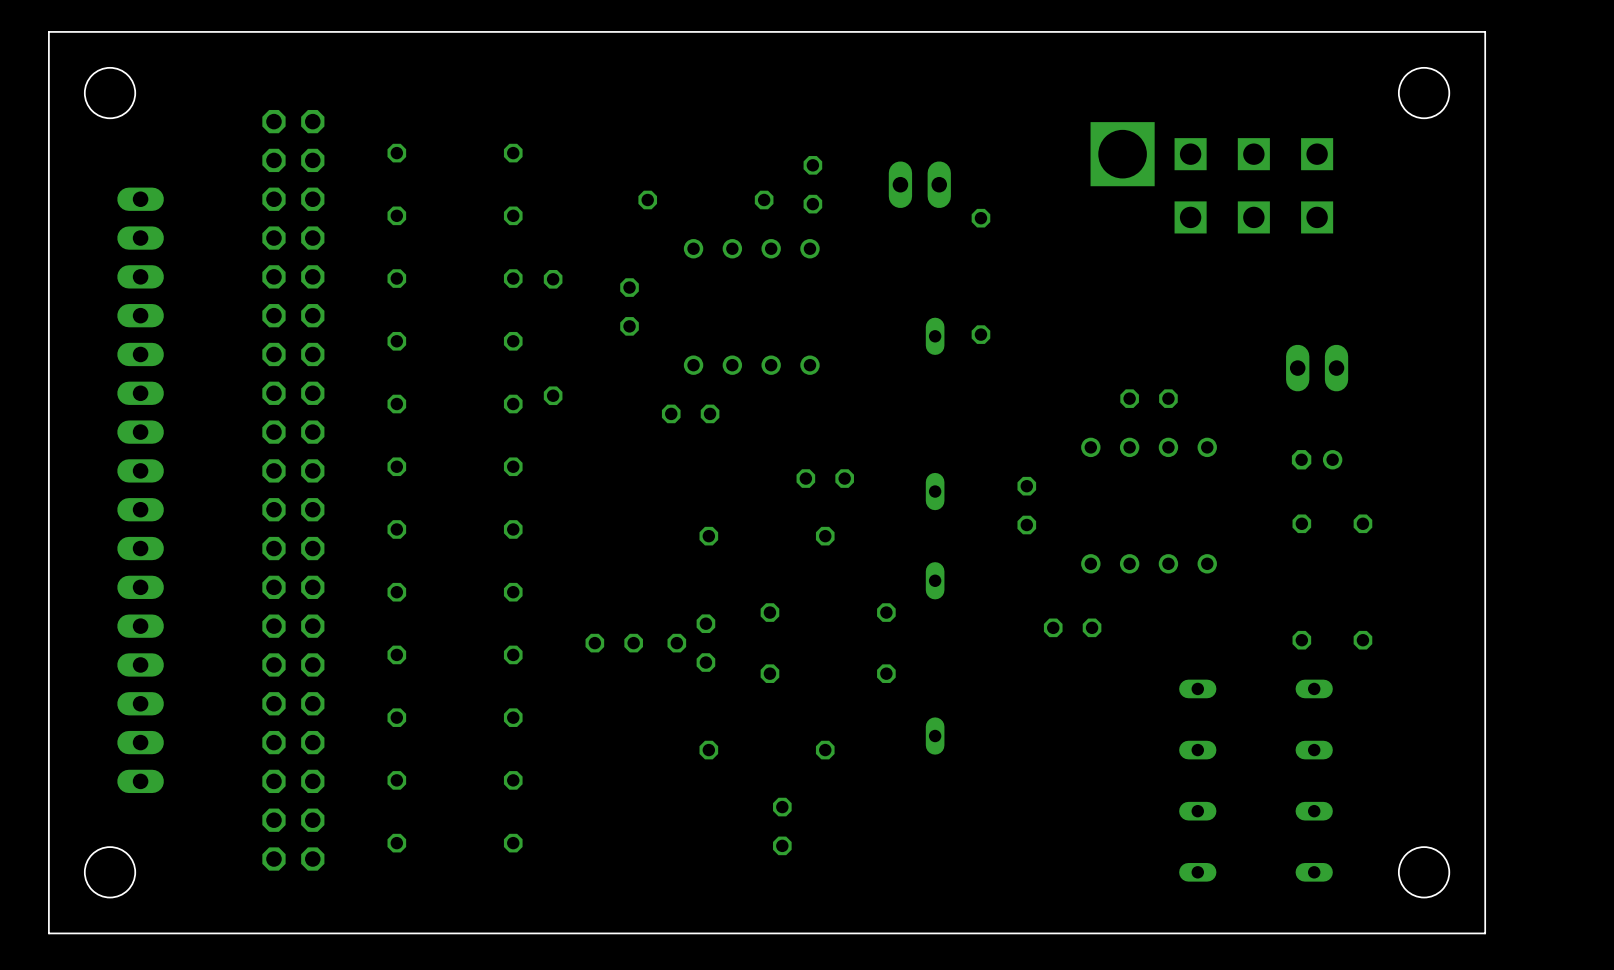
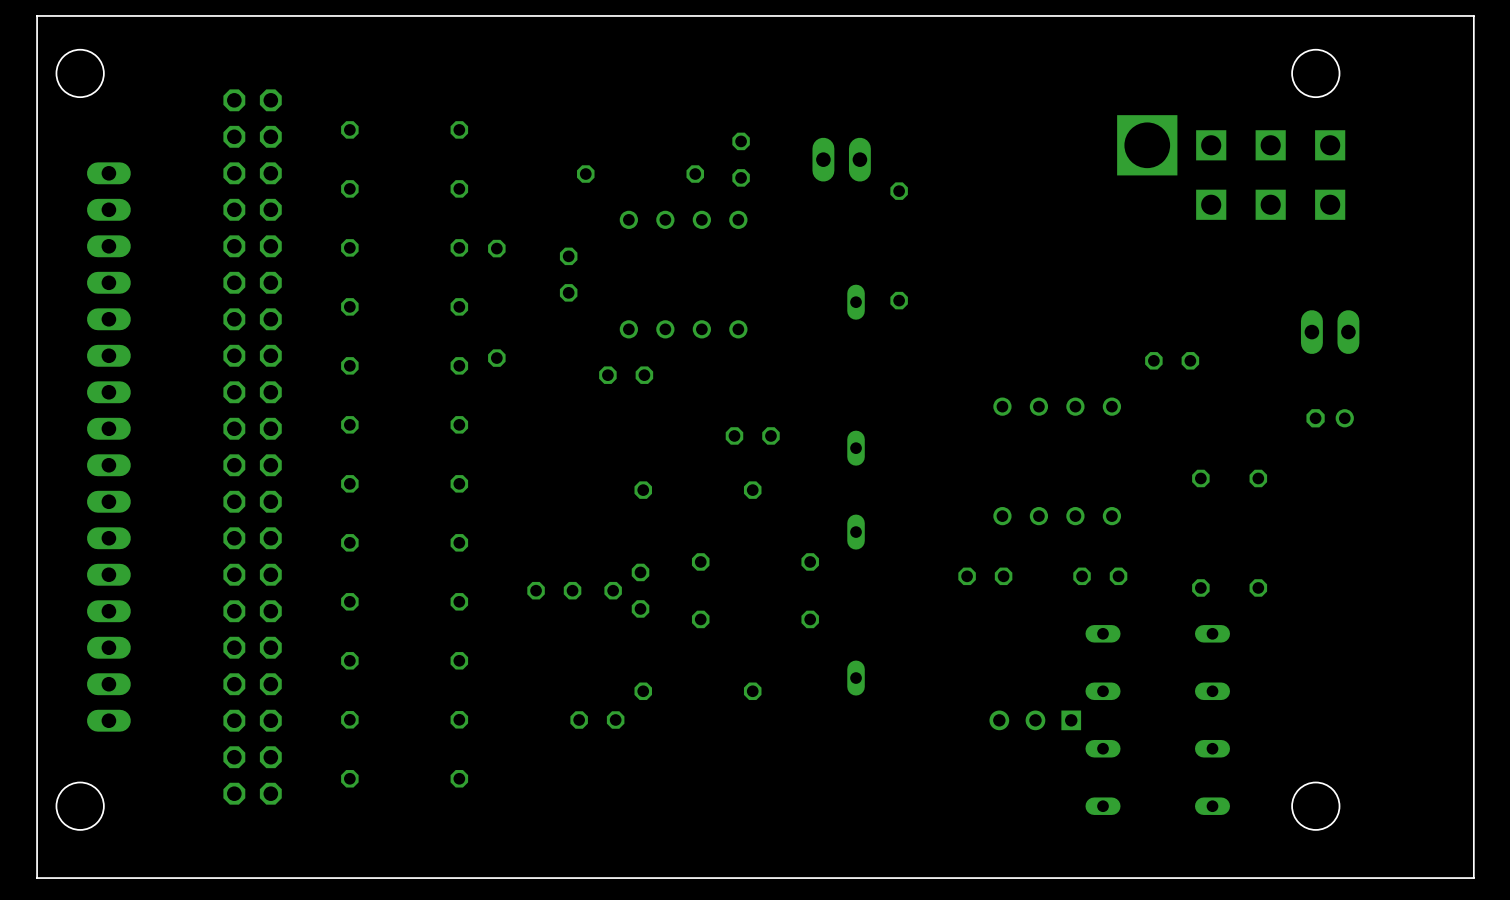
board edge: (1485, 31) (1485, 933) (48, 933) (48, 31) (64, 31) -> (1373, 15) (1473, 15) (1473, 878) (37, 878) (37, 15)
part position: (1211, 177) -> (1231, 167)
part position: (1317, 368) -> (1330, 332)
part: (1149, 398) -> none
part: none -> (1172, 360)
part position: (1317, 459) -> (1330, 418)
part: (1026, 505) -> none
part: none -> (1100, 576)
part: none -> (1035, 720)
part rotation: 0° (782, 826) -> 90° clockwise (597, 720)
part position: (782, 826) -> (597, 720)

